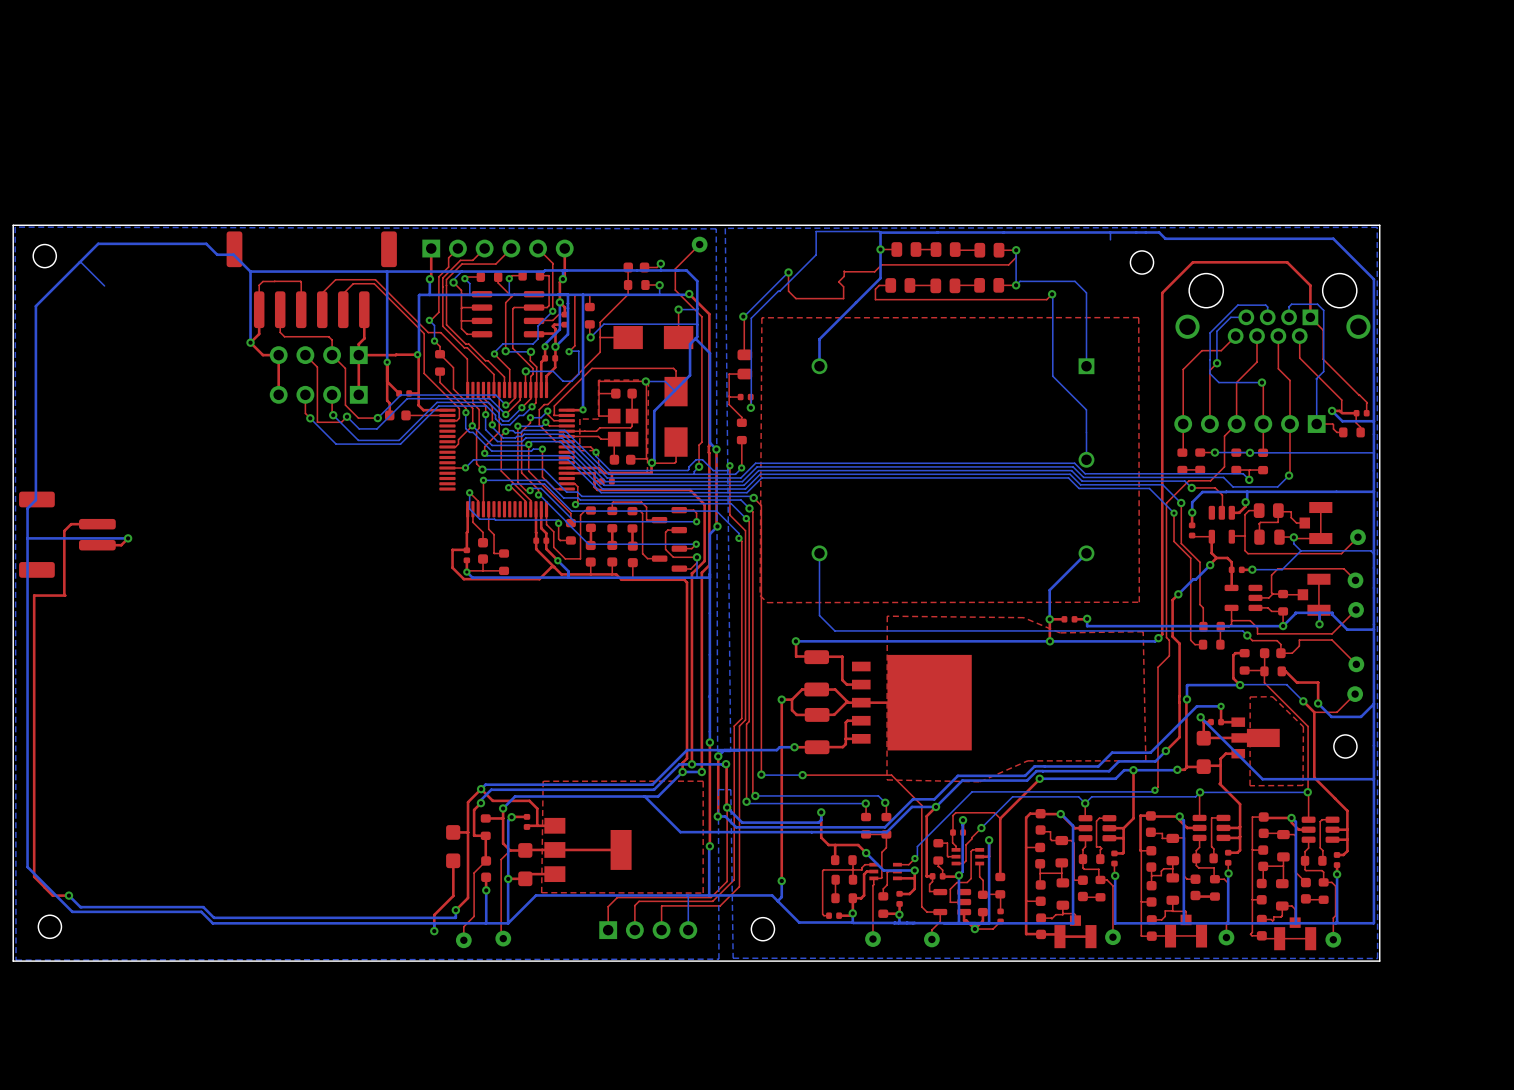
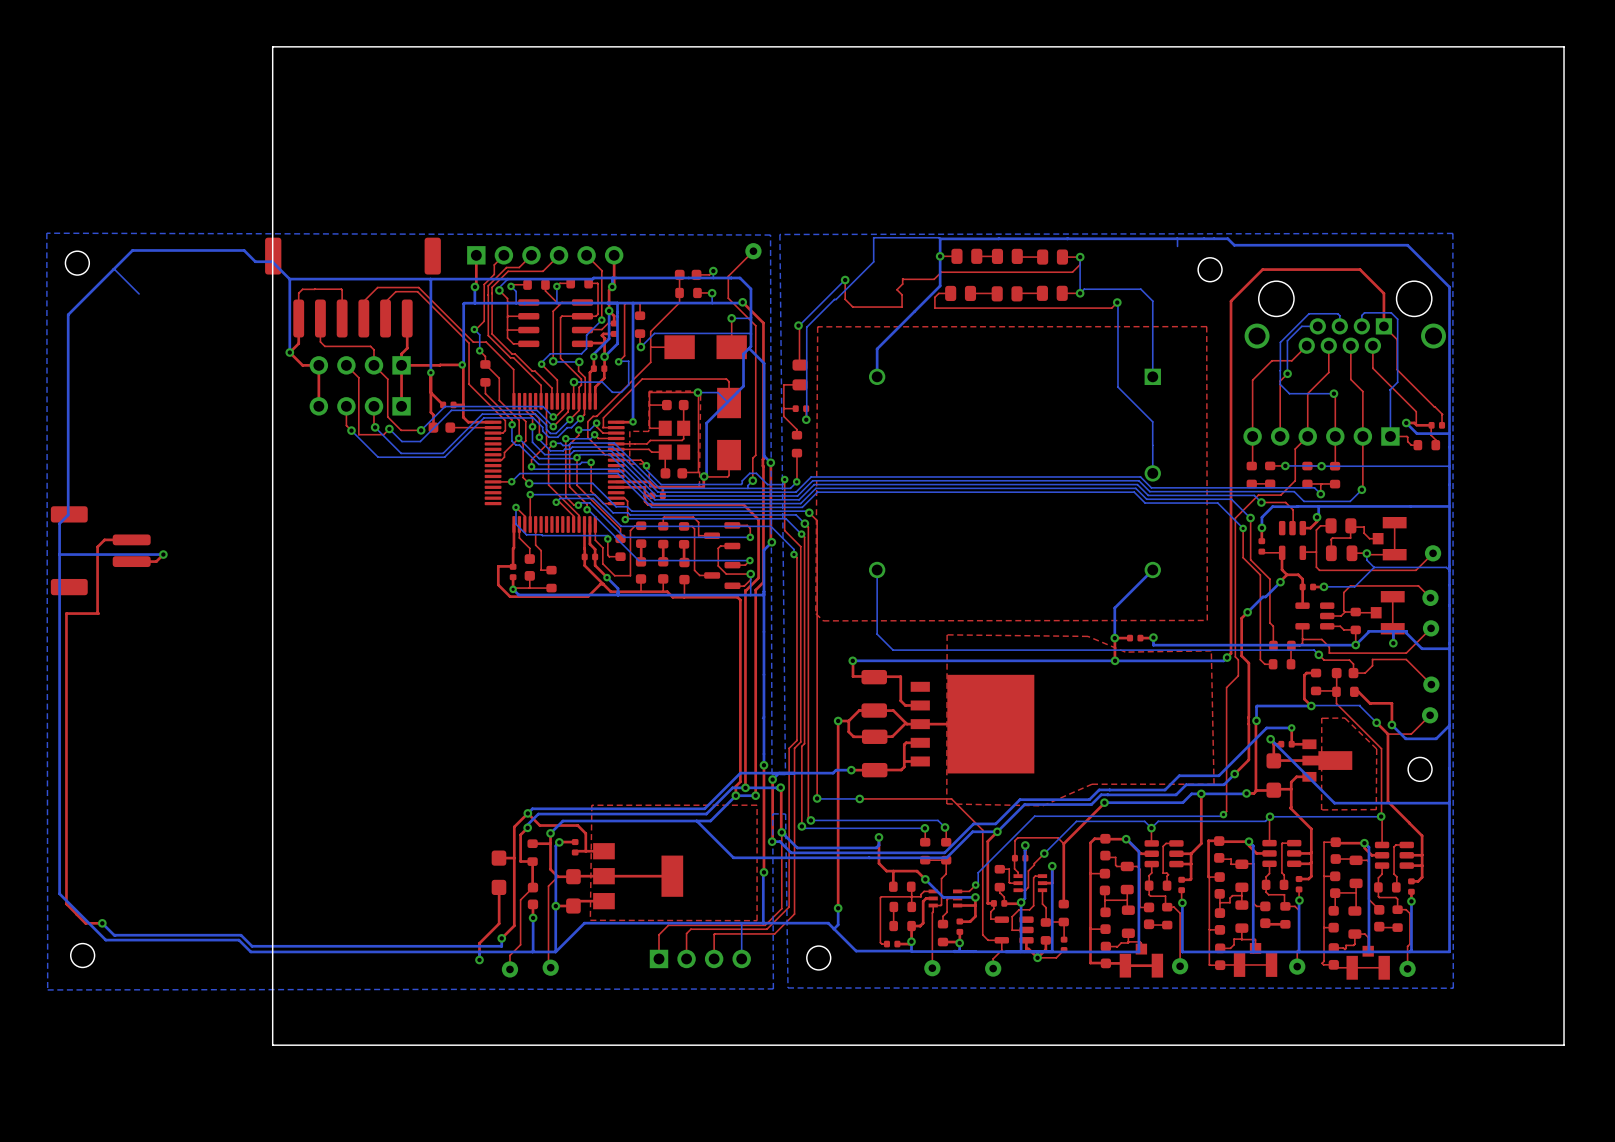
board edge: (1379, 225) (13, 225) (13, 961) (1379, 961) (1379, 225) -> (1564, 46) (1564, 1045) (272, 1045) (272, 46) (1564, 46)

